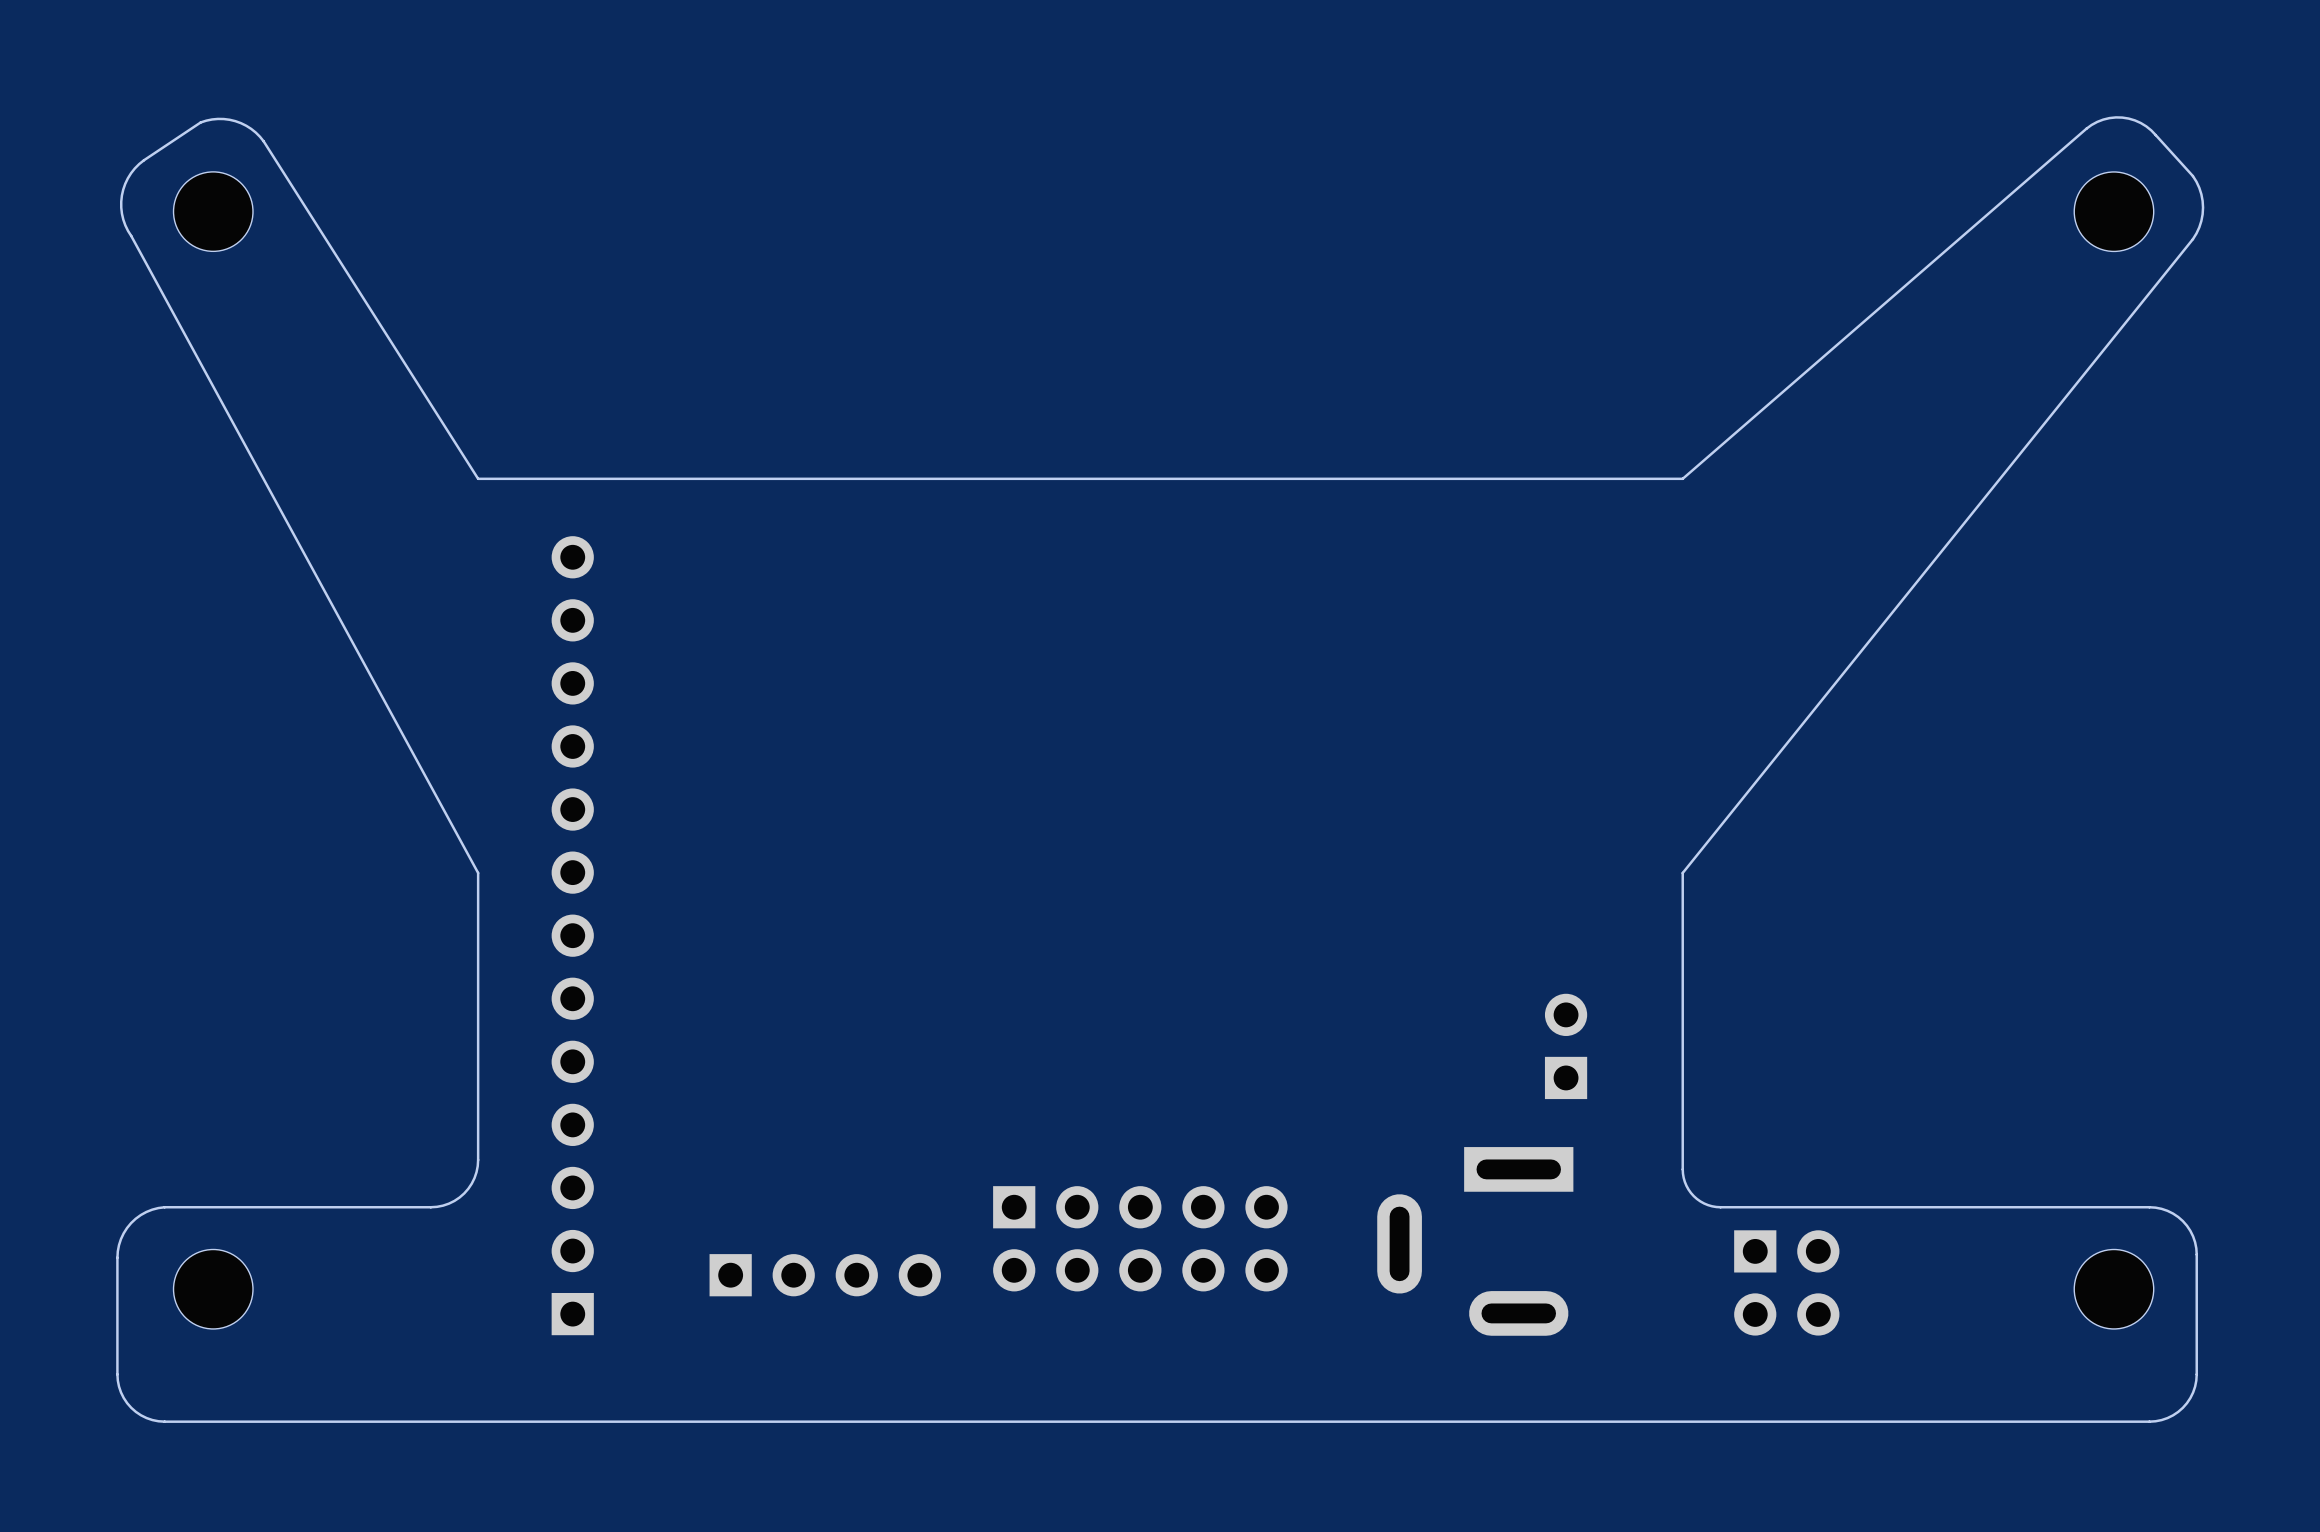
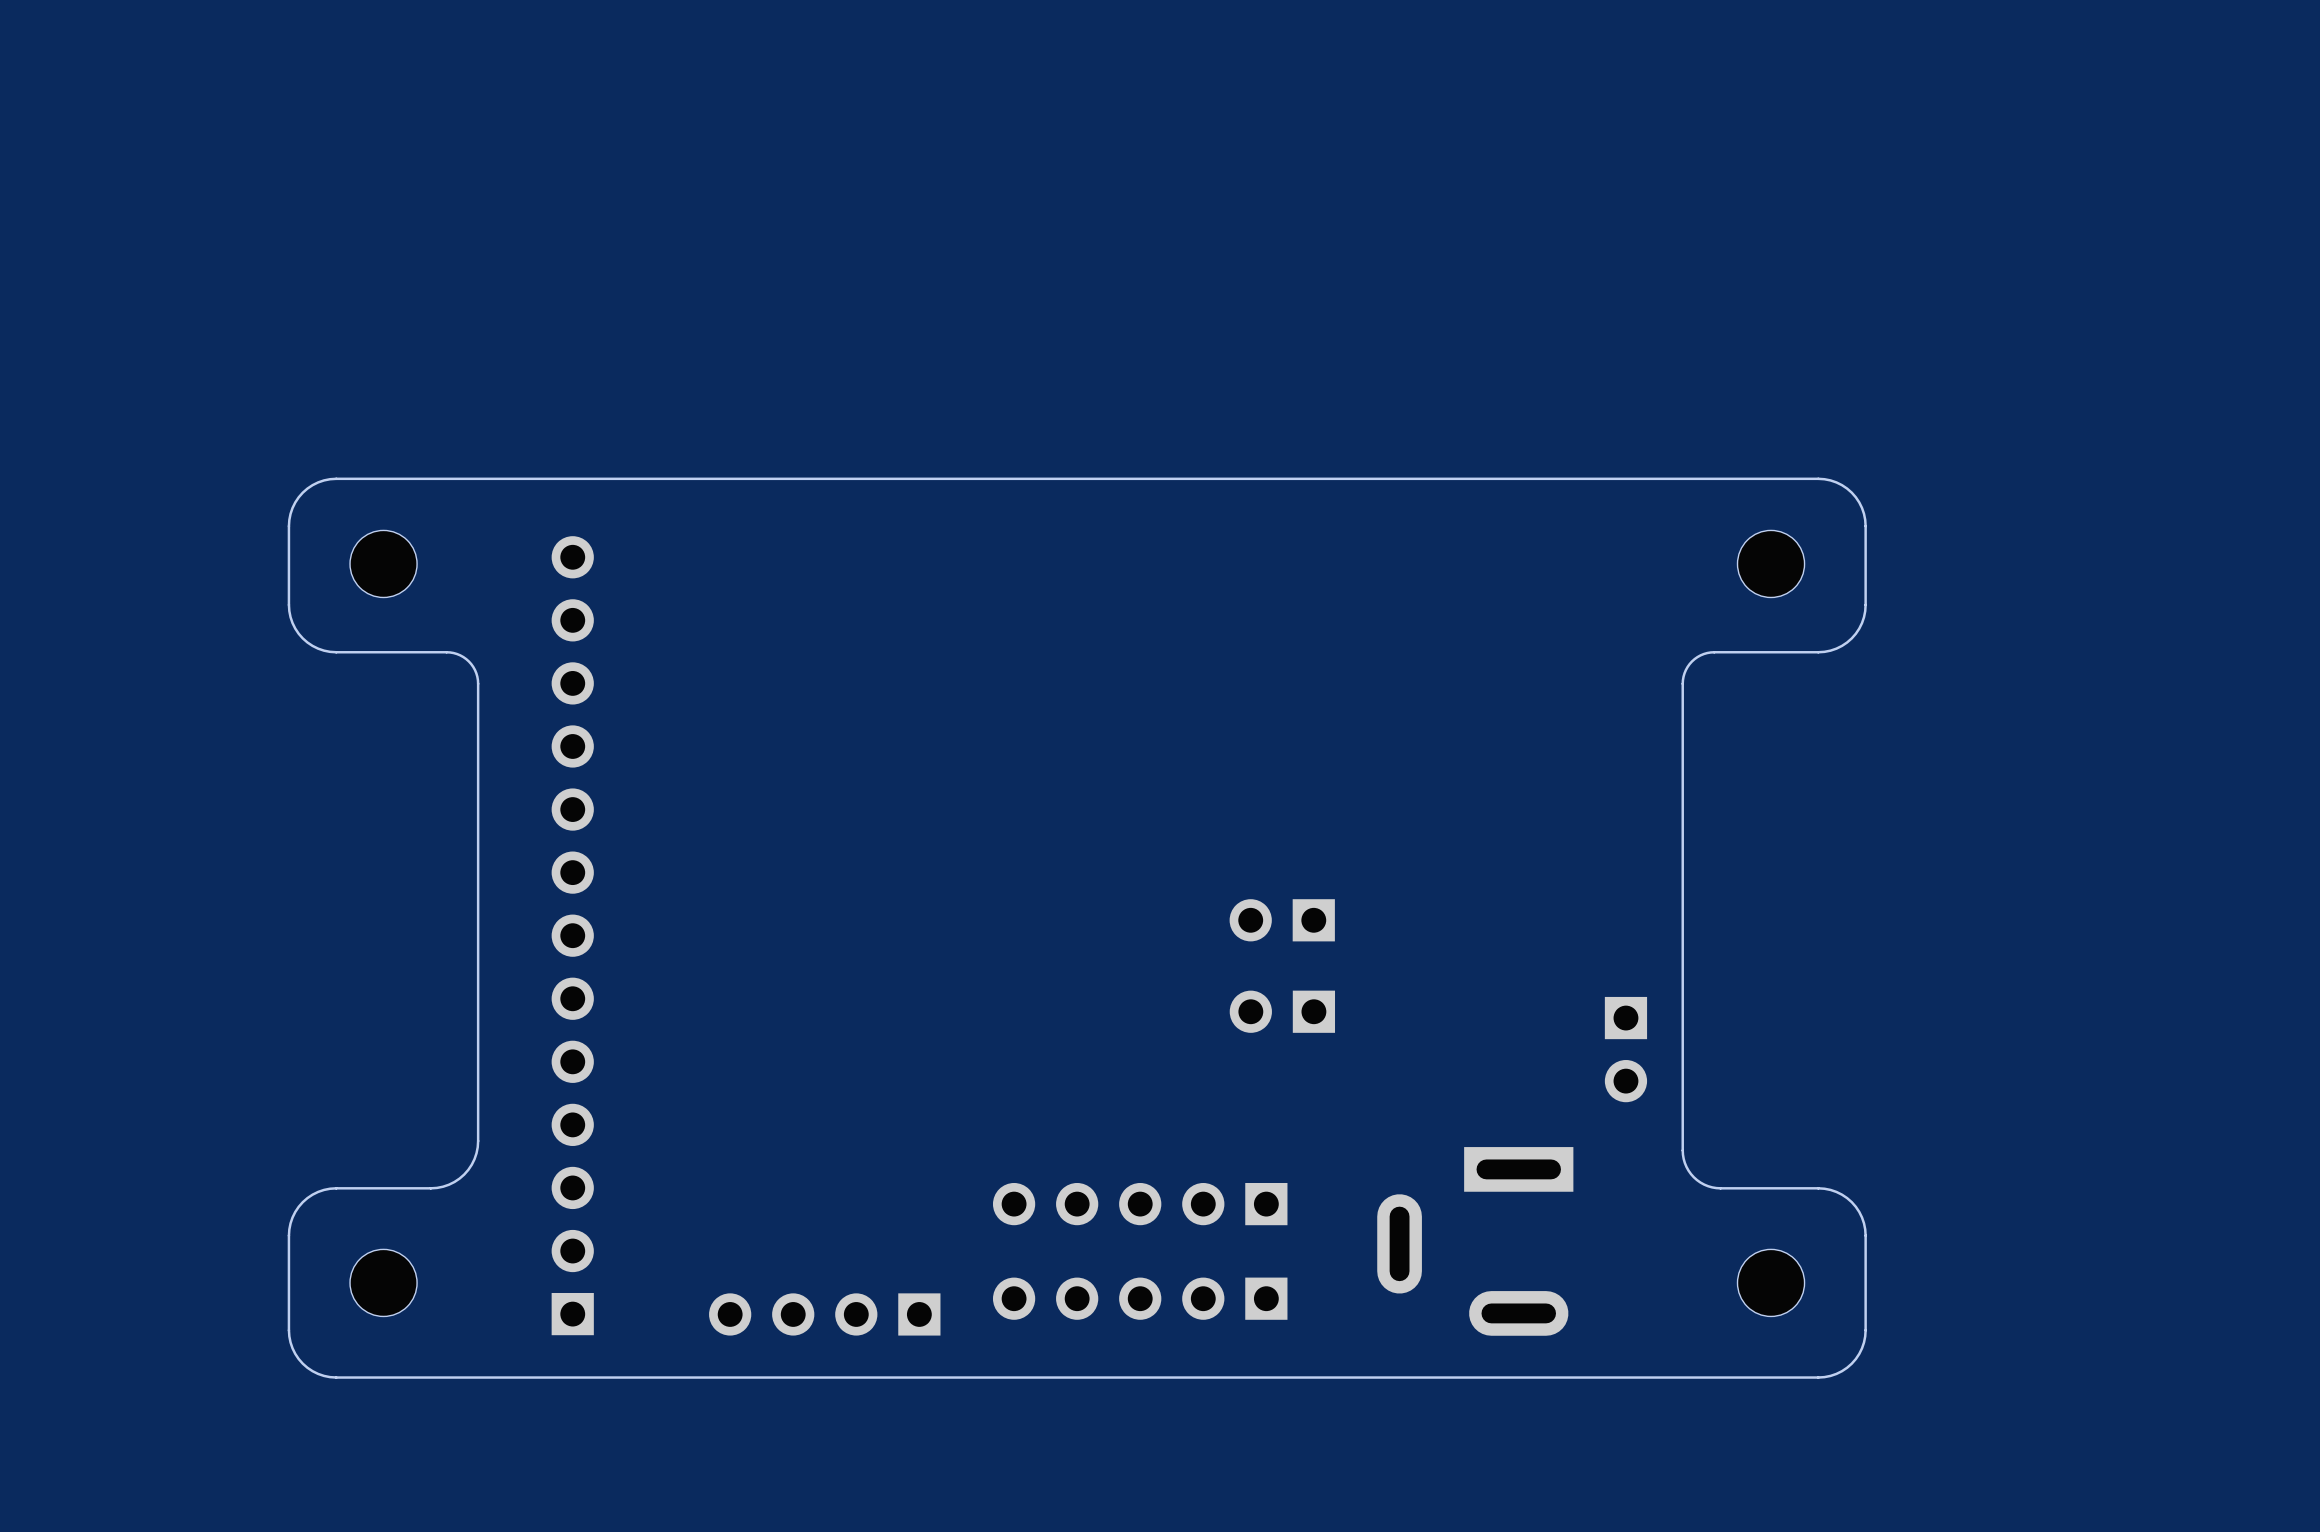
part: (213, 211) -> none
part: (2113, 211) -> none
board edge: (478, 478) (263, 141) (255, 132) (240, 123) (229, 119) (206, 120) (143, 160) (134, 168) (127, 178) (121, 195) (121, 213) (128, 230) (478, 872) -> (478, 478) (323, 480) (307, 488) (298, 497) (292, 508) (288, 526) (289, 611) (295, 628) (307, 642) (318, 648) (330, 651) (450, 652) (466, 659) (475, 670) (478, 683) (478, 872)
board edge: (1682, 478) (2091, 125) (2103, 119) (2115, 117) (2128, 118) (2140, 123) (2155, 135) (2196, 181) (2201, 194) (2203, 207) (2199, 227) (2192, 239) (1682, 872) -> (1682, 478) (1830, 480) (1847, 488) (1855, 497) (1864, 513) (1865, 526) (1865, 611) (1859, 628) (1847, 642) (1836, 648) (1824, 651) (1707, 653) (1694, 659) (1685, 670) (1682, 683) (1682, 872)
part: none -> (383, 563)
part: none -> (1771, 563)
part: none -> (1282, 920)
part: none -> (1282, 1011)
part rotation: 0° (1566, 1046) -> 180° (1625, 1049)
board edge: (478, 1141) (477, 1166) (471, 1183) (459, 1197) (443, 1205) (430, 1207) (164, 1207) (146, 1211) (135, 1218) (127, 1228) (120, 1239) (117, 1257) (117, 1380) (121, 1392) (127, 1403) (135, 1411) (146, 1418) (164, 1421) (2149, 1421) (2161, 1420) (2173, 1415) (2182, 1407) (2193, 1392) (2196, 1374) (2196, 1248) (2193, 1236) (2186, 1225) (2178, 1217) (2167, 1210) (2149, 1207) (1716, 1207) (1700, 1201) (1688, 1189) (1682, 1173) (1682, 1150) -> (478, 1141) (474, 1159) (468, 1169) (459, 1178) (448, 1184) (430, 1188) (330, 1188) (312, 1194) (298, 1206) (292, 1217) (289, 1229) (288, 1330) (290, 1342) (295, 1353) (307, 1367) (323, 1375) (336, 1377) (1818, 1377) (1830, 1375) (1847, 1367) (1859, 1353) (1864, 1342) (1865, 1330) (1865, 1229) (1862, 1217) (1855, 1206) (1841, 1194) (1824, 1188) (1720, 1188) (1708, 1186) (1690, 1174) (1684, 1162) (1682, 1150)
part: none -> (1140, 1204)
part footprint: [1734, 1230, 1840, 1336] -> [1737, 1249, 1805, 1317]
part: (1140, 1238) -> none
part rotation: 0° (825, 1275) -> 180° (824, 1314)
part: none -> (383, 1282)
part: (213, 1289) -> none
part: (2113, 1289) -> none
part: none -> (1140, 1298)

